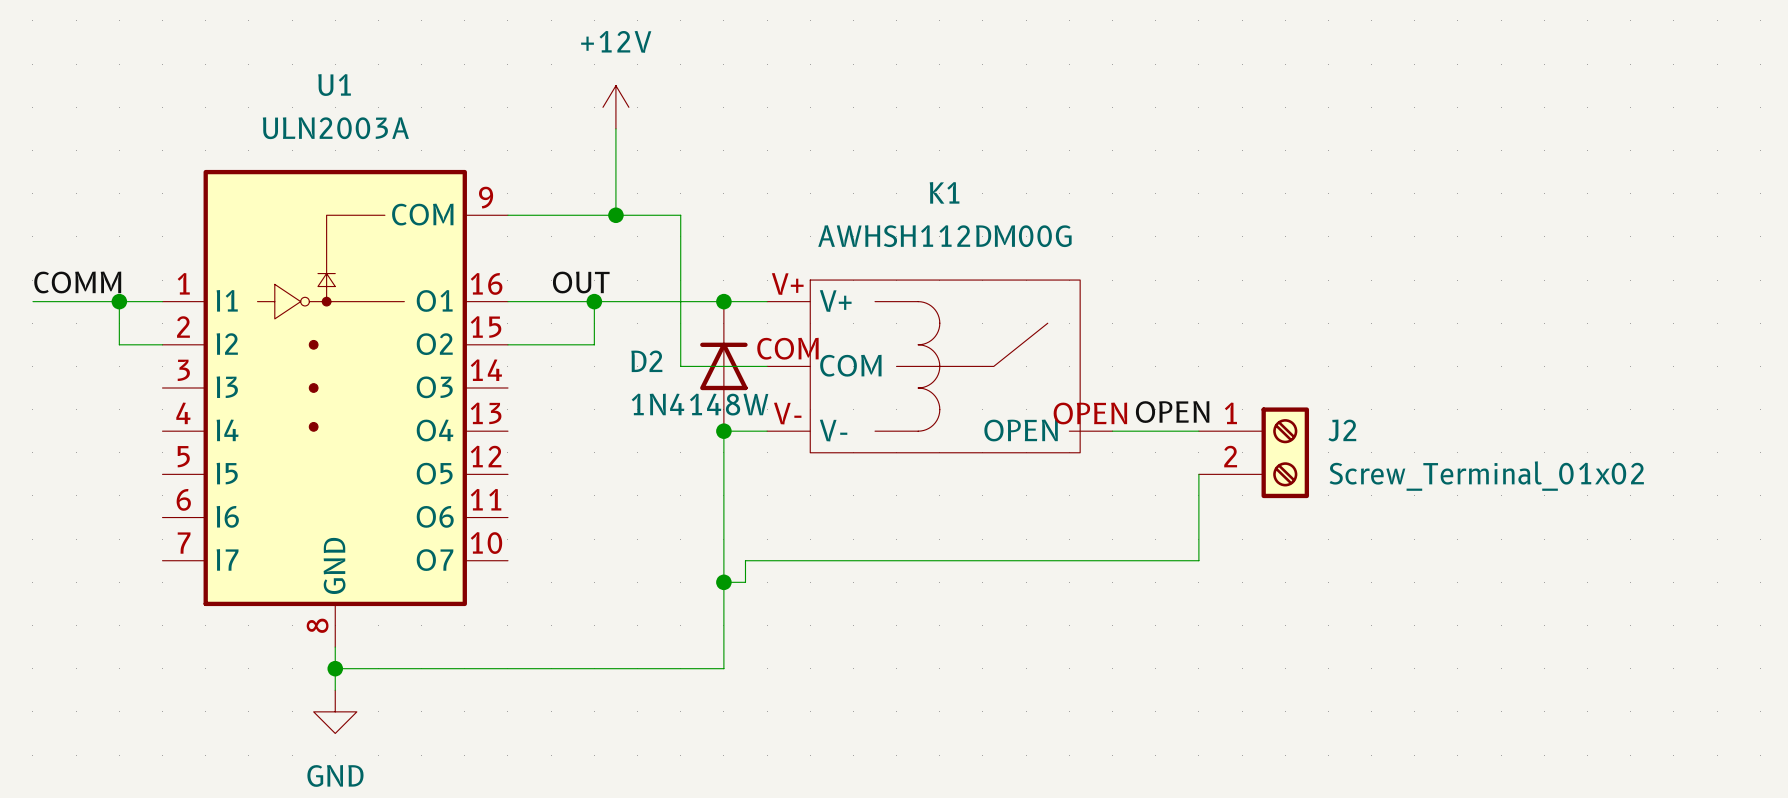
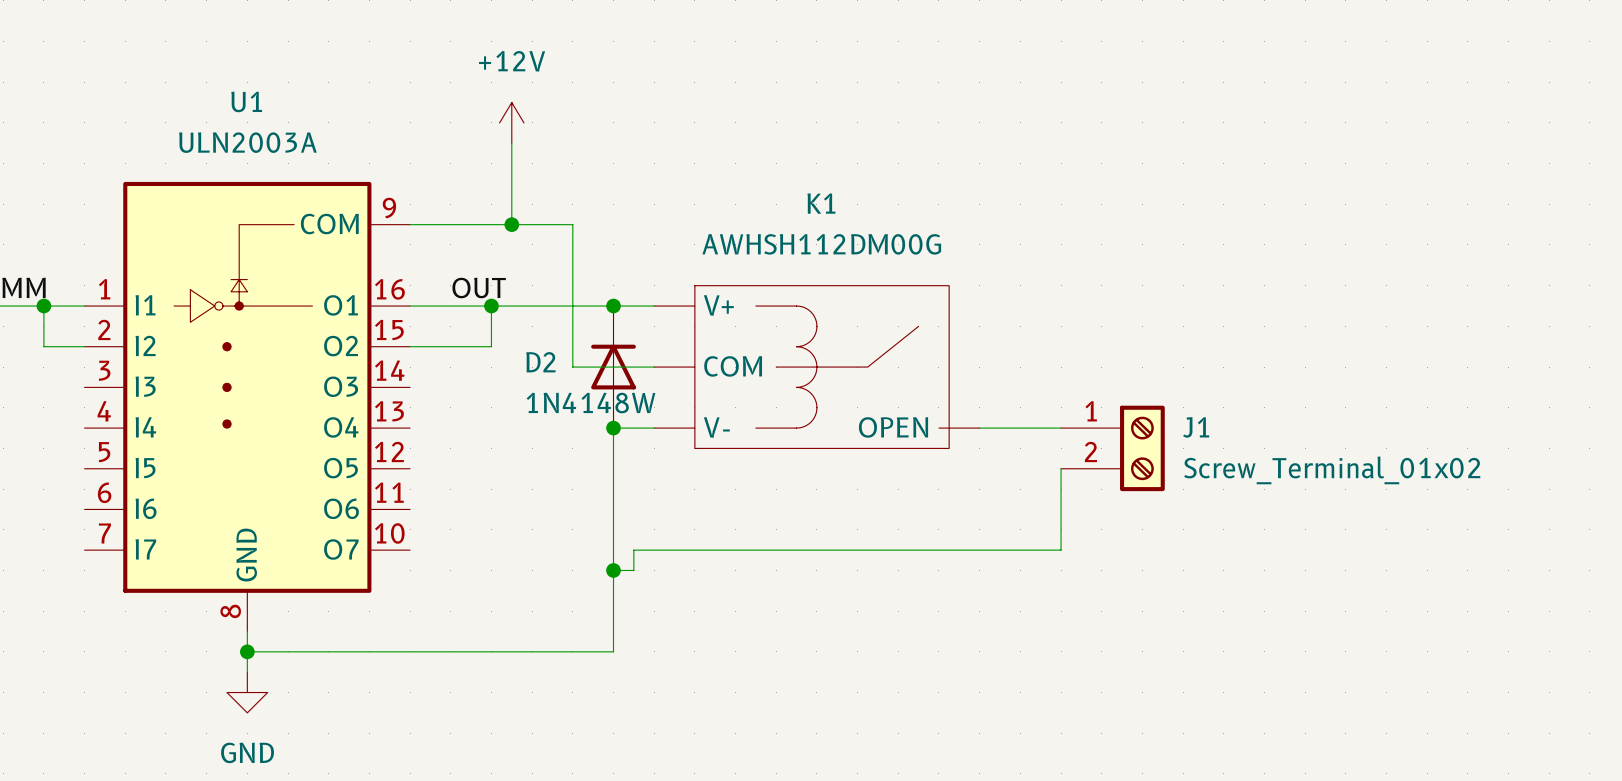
K1 pin number: V+ (787, 283) -> none
K1 pin number: COM (787, 348) -> none
label: OPEN (1172, 412) -> none
K1 pin number: V- (787, 413) -> none
K1 pin number: OPEN (1090, 413) -> none
J2 name: J2 (1342, 430) -> J1 (1196, 427)

